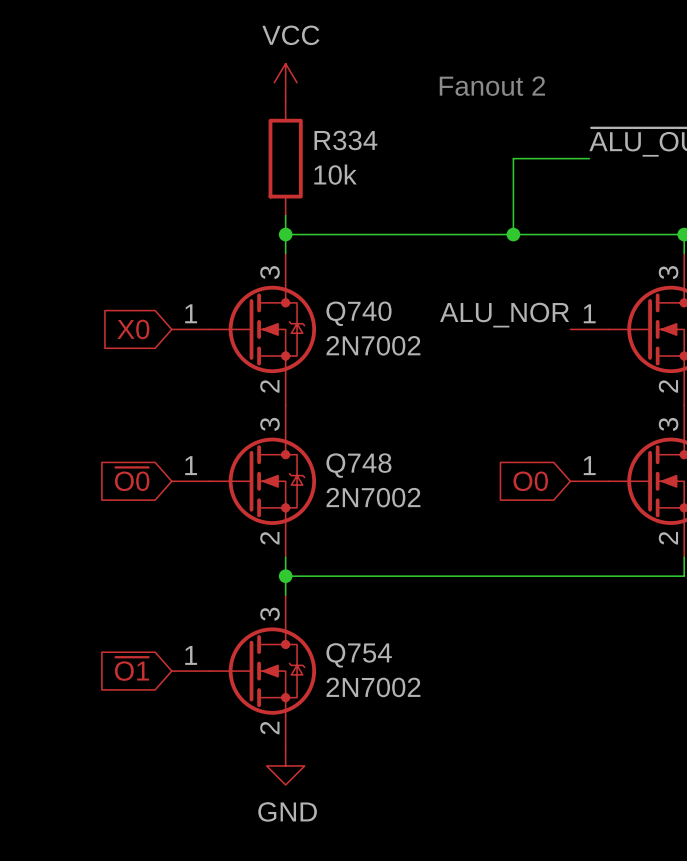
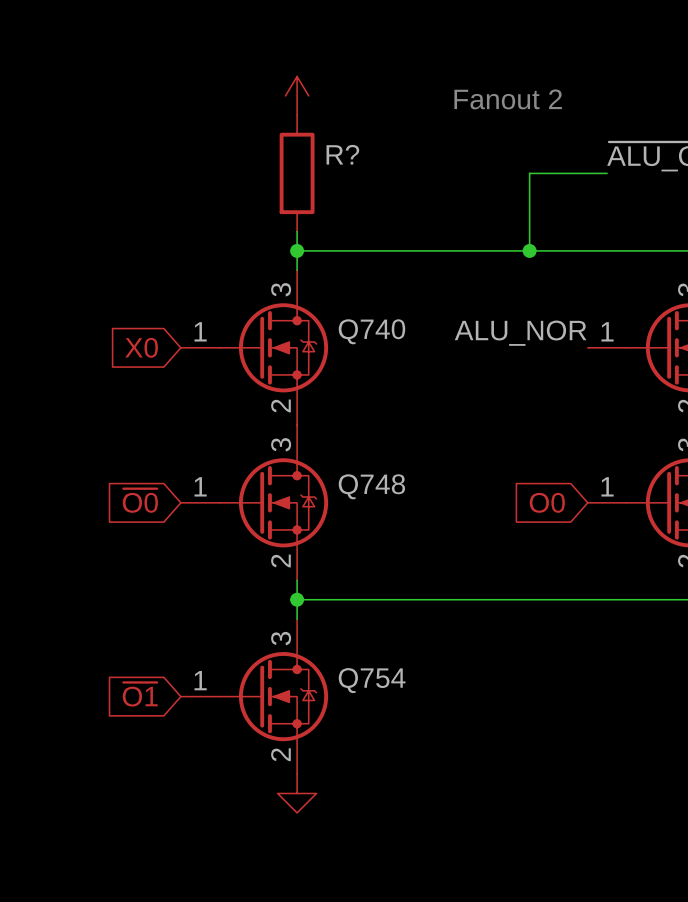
power symbol text: VCC (290, 35) -> none
R334 name: R334 (345, 140) -> R? (342, 154)
R334 value: 10k (335, 174) -> none
Q740 value: 2N7002 (373, 345) -> none
Q748 value: 2N7002 (373, 497) -> none
Q754 value: 2N7002 (373, 687) -> none
power symbol text: GND (287, 811) -> none

